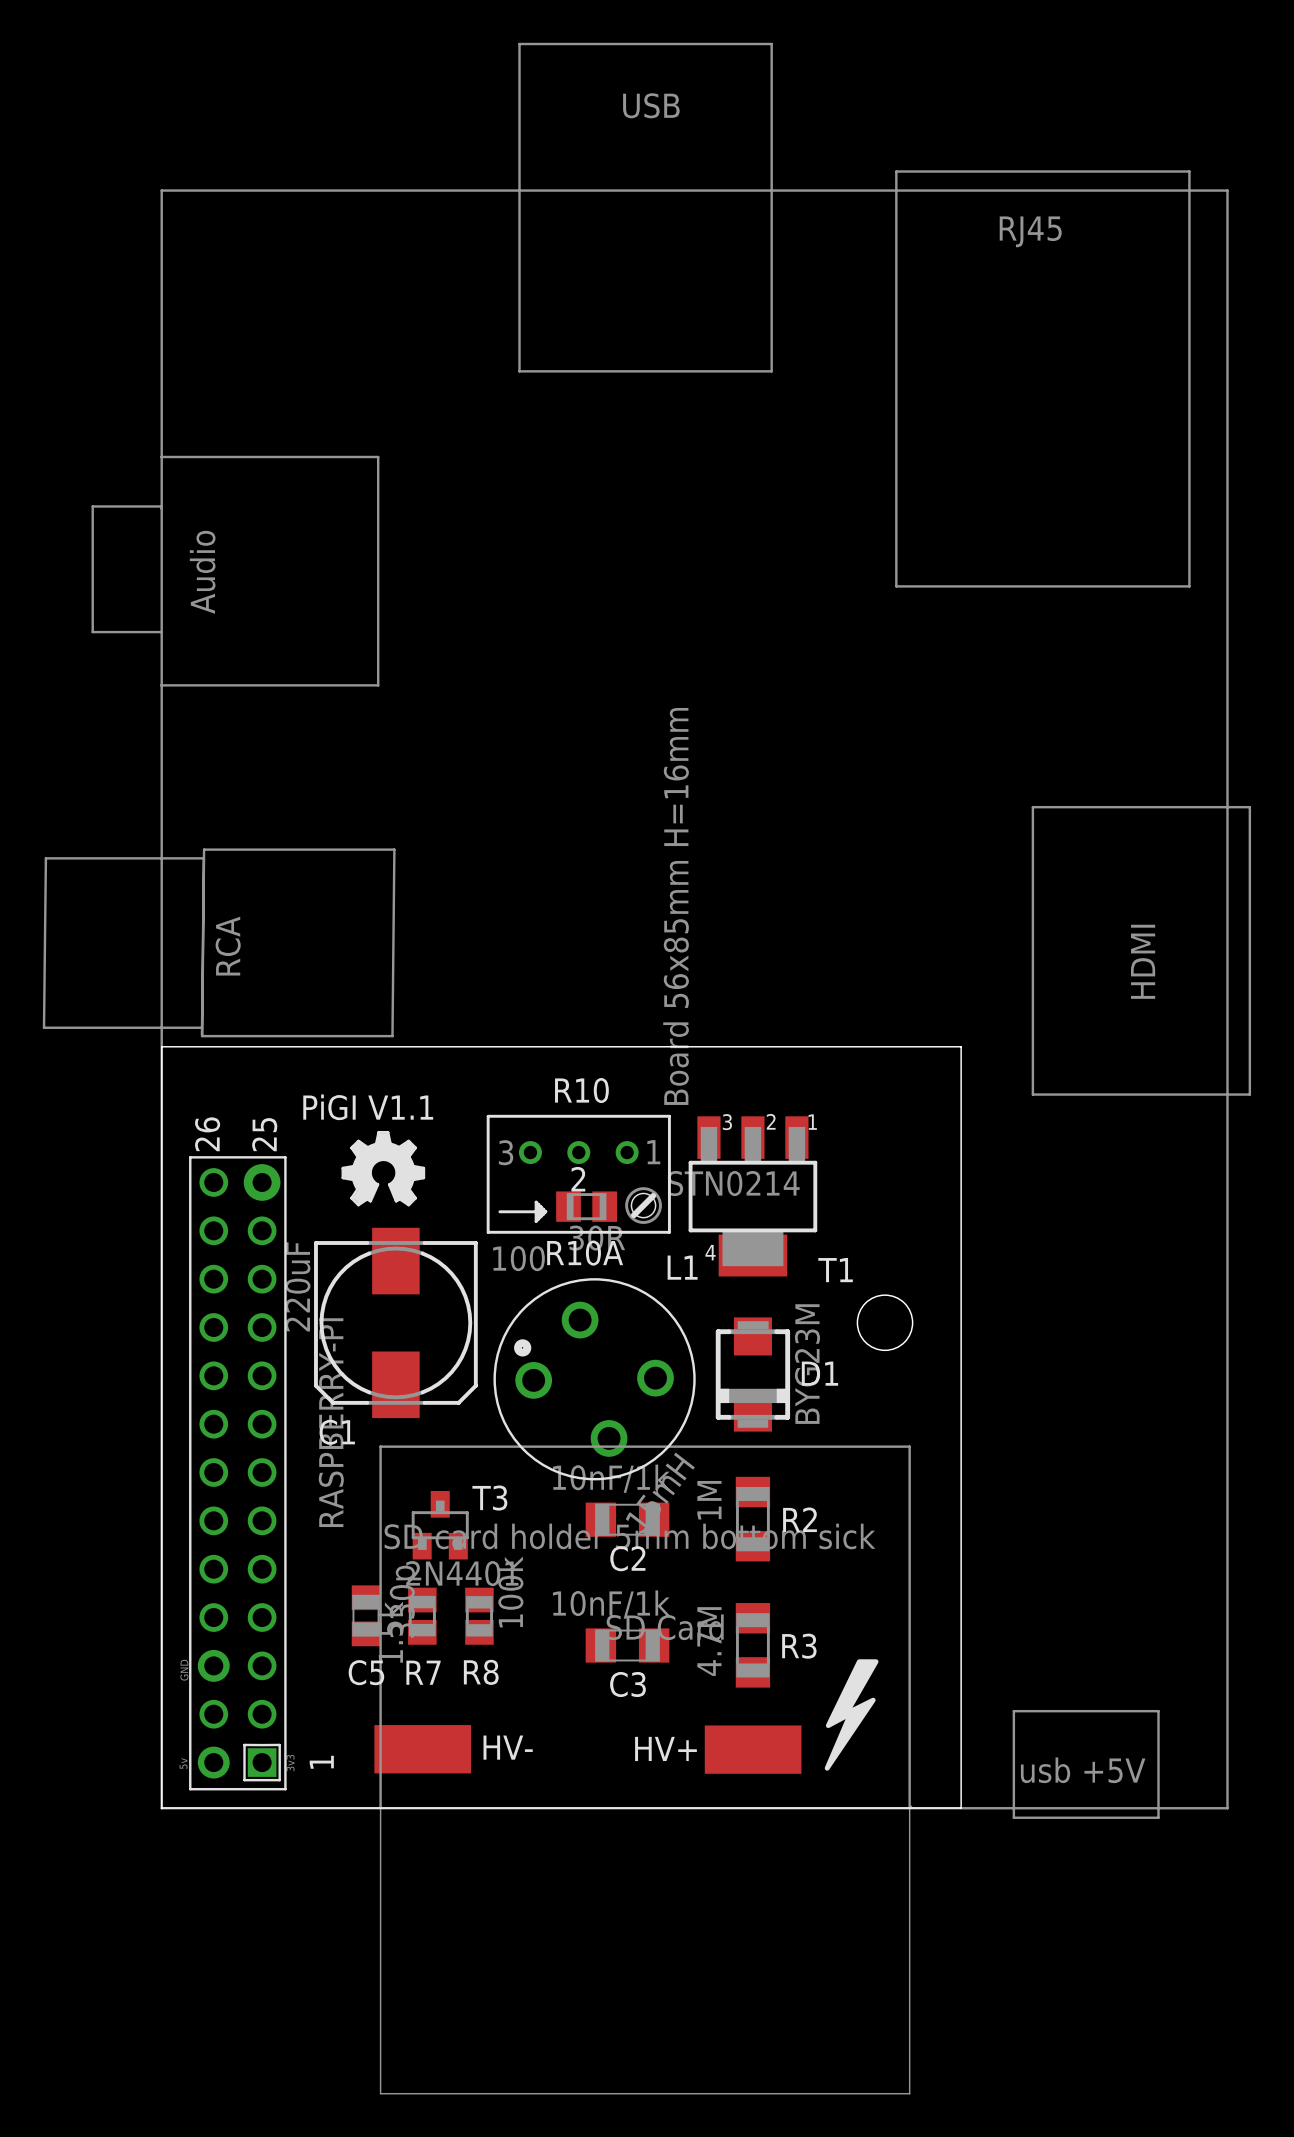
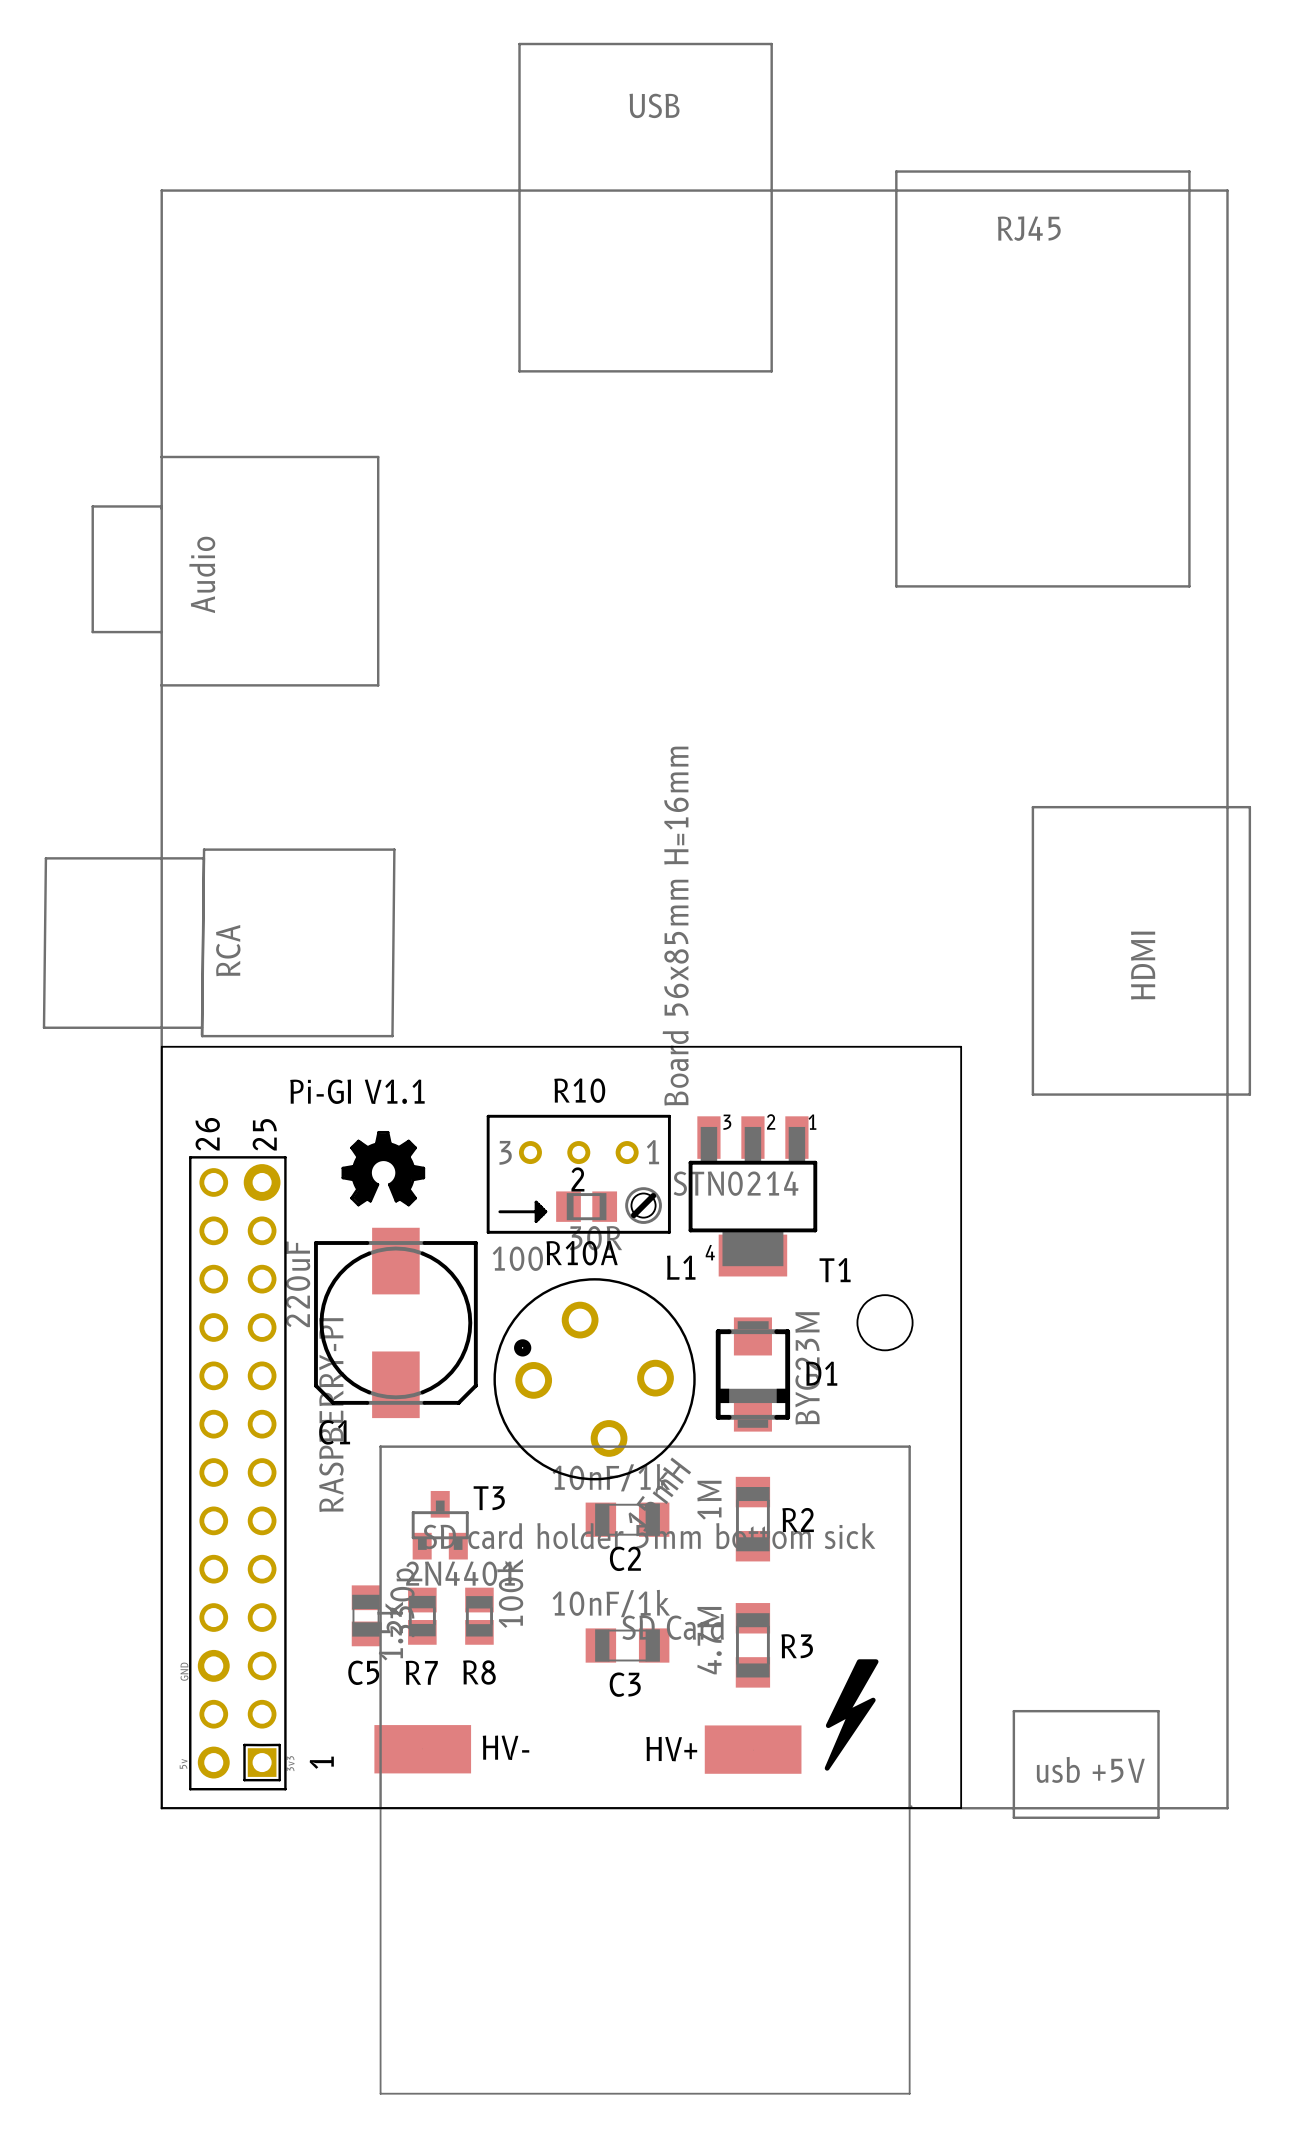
text: PiGI V1.1 (368, 1107) -> Pi-GI V1.1 (357, 1091)

